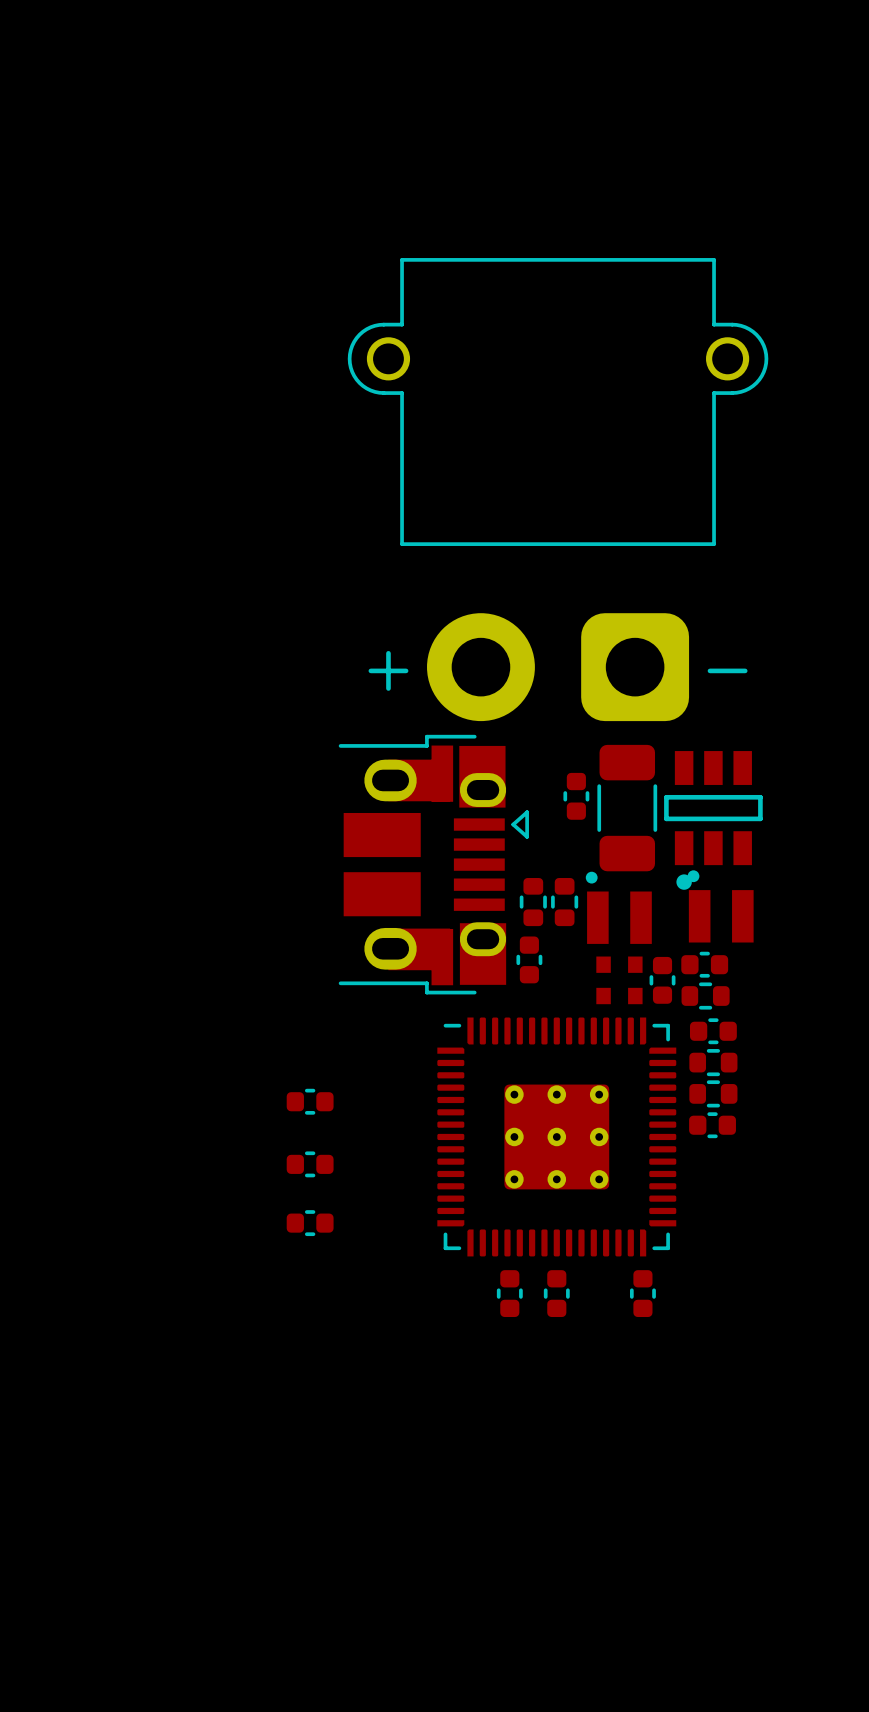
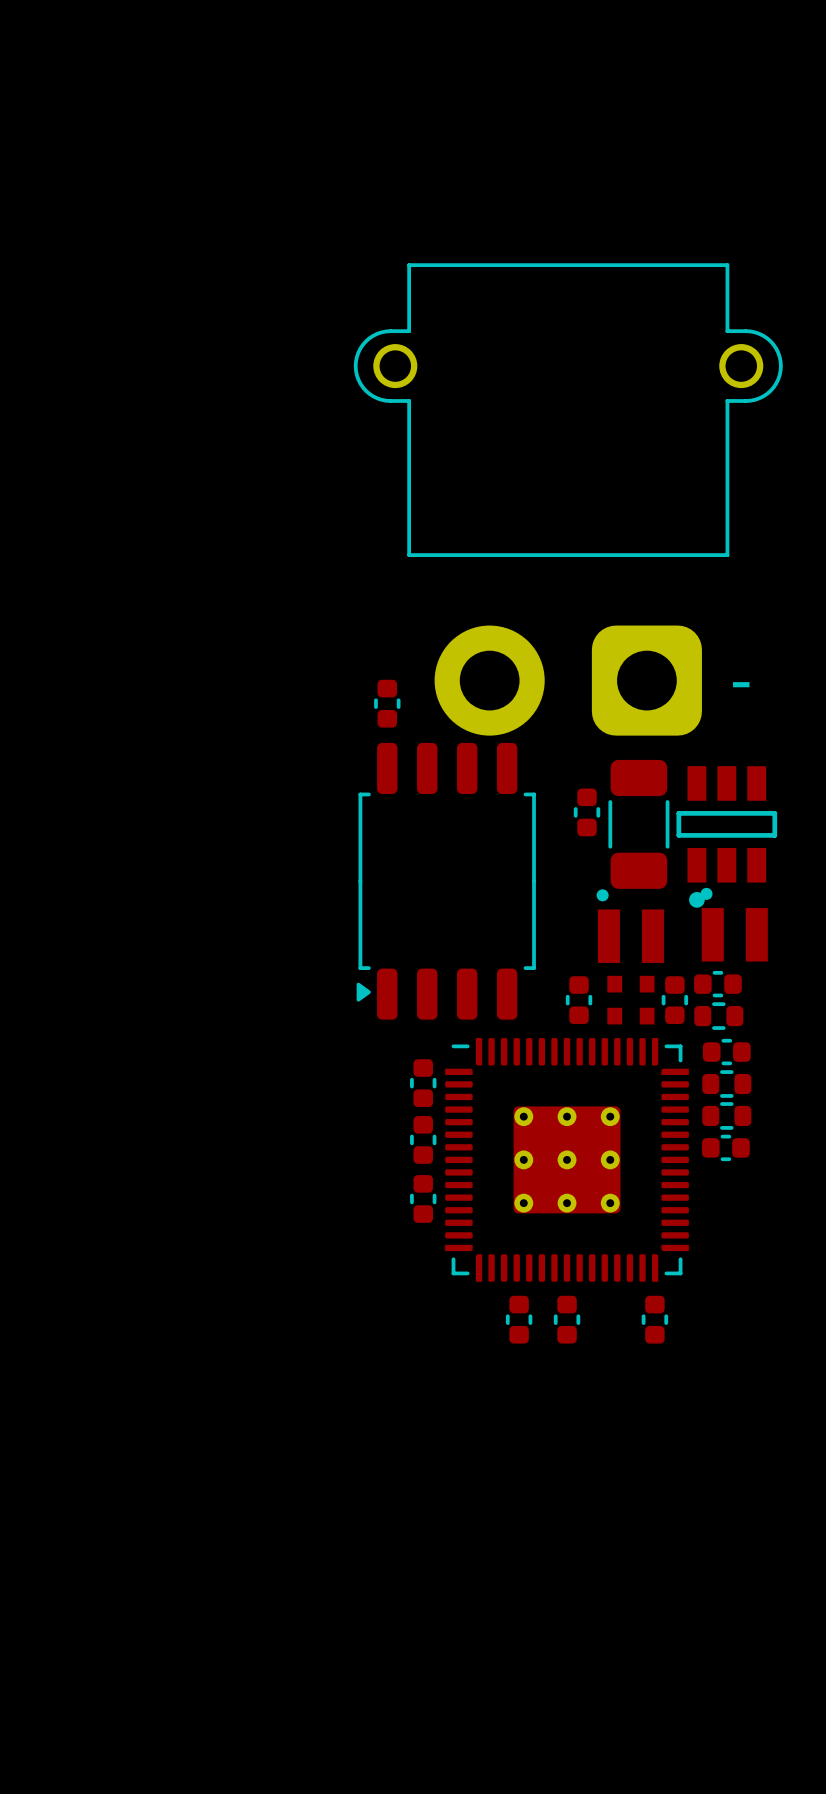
part text: + (388, 670) -> none
part: none -> (387, 703)
part footprint: [338, 734, 529, 995] -> [356, 742, 536, 1020]
part: (533, 902) -> none
part: (564, 902) -> none
part position: (529, 959) -> (579, 1000)
part: none -> (423, 1083)
part: (310, 1101) -> none
part: none -> (423, 1139)
part: (310, 1164) -> none
part: none -> (423, 1198)
part: (310, 1223) -> none

